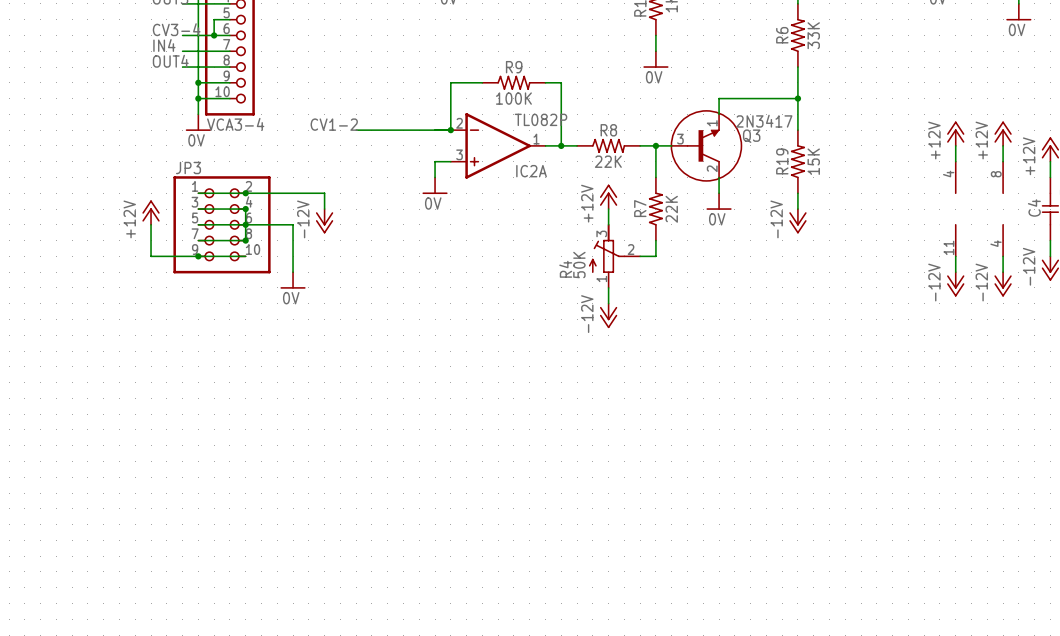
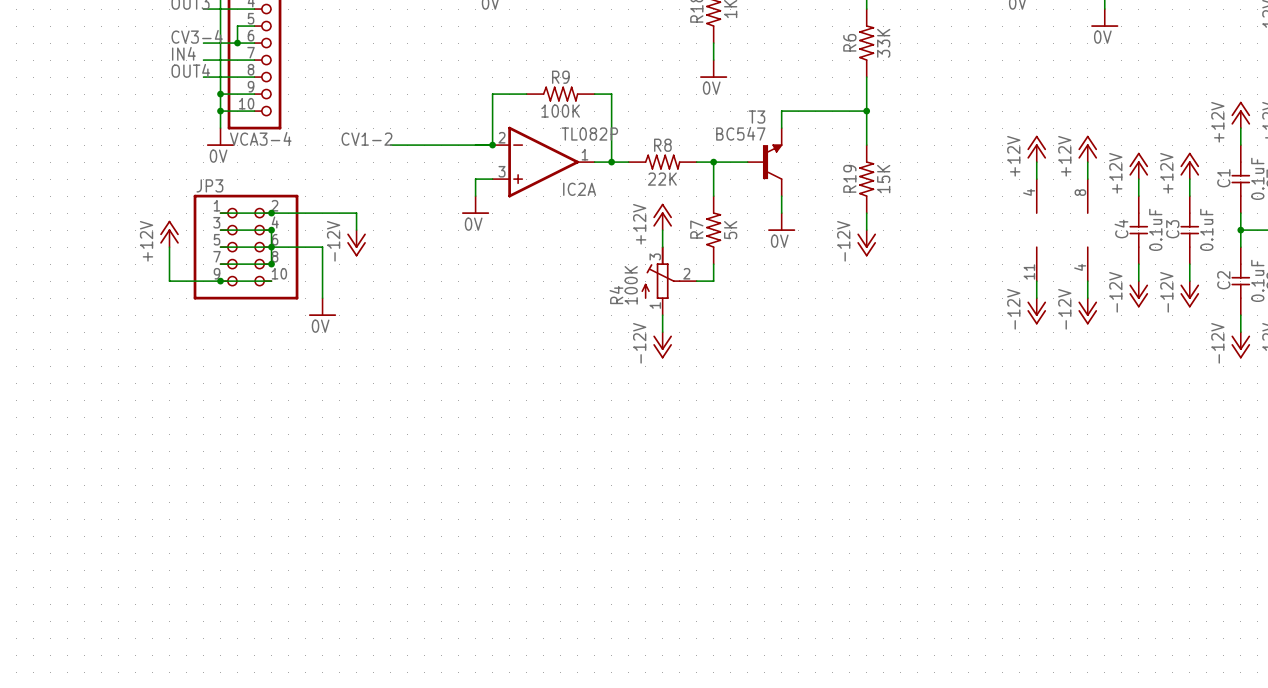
T3: none -> BC547 (764, 162)
Q3: 2N3417 (706, 145) -> none
R7 value: 22K (671, 209) -> 5K (730, 230)
R4 value: 50K (579, 265) -> 100K (631, 285)

